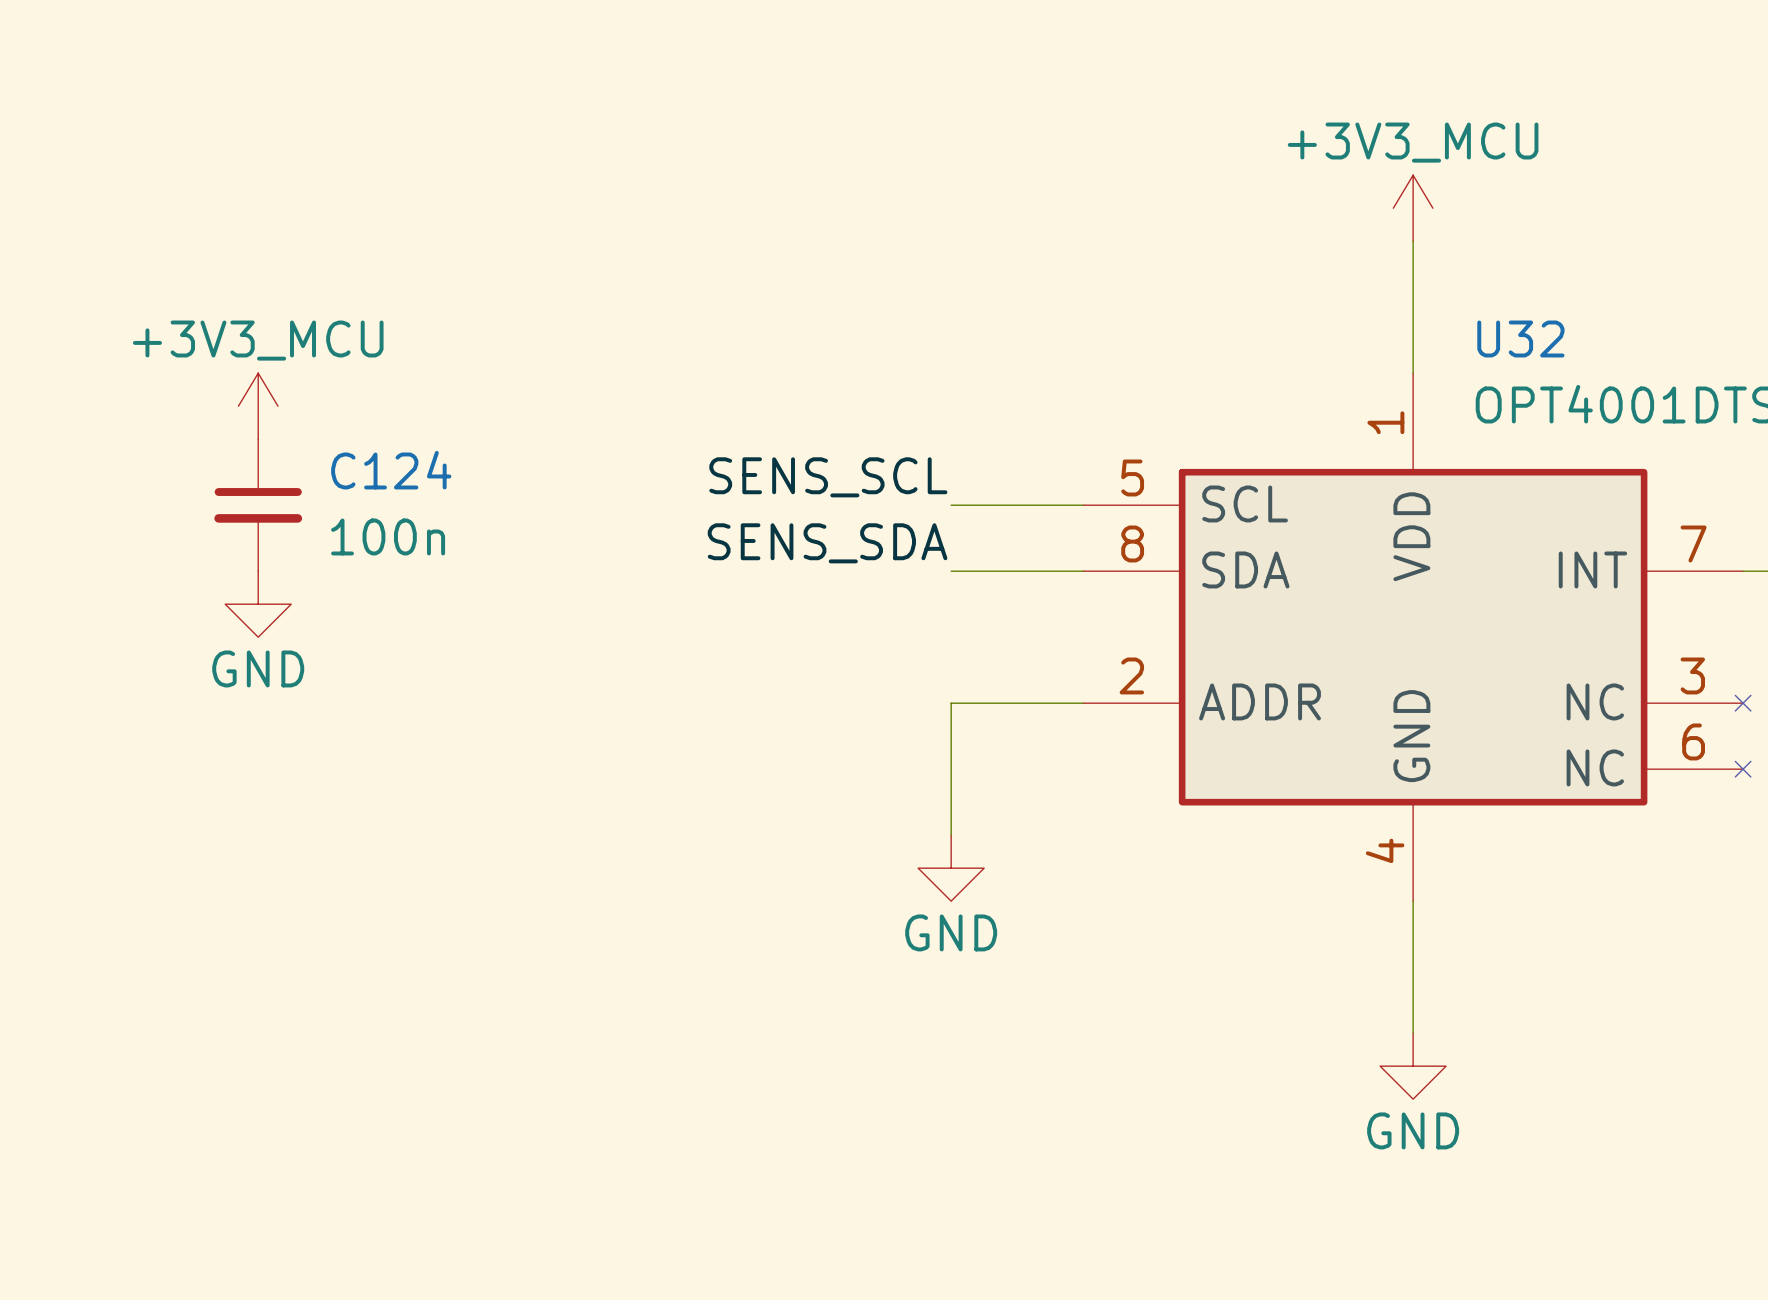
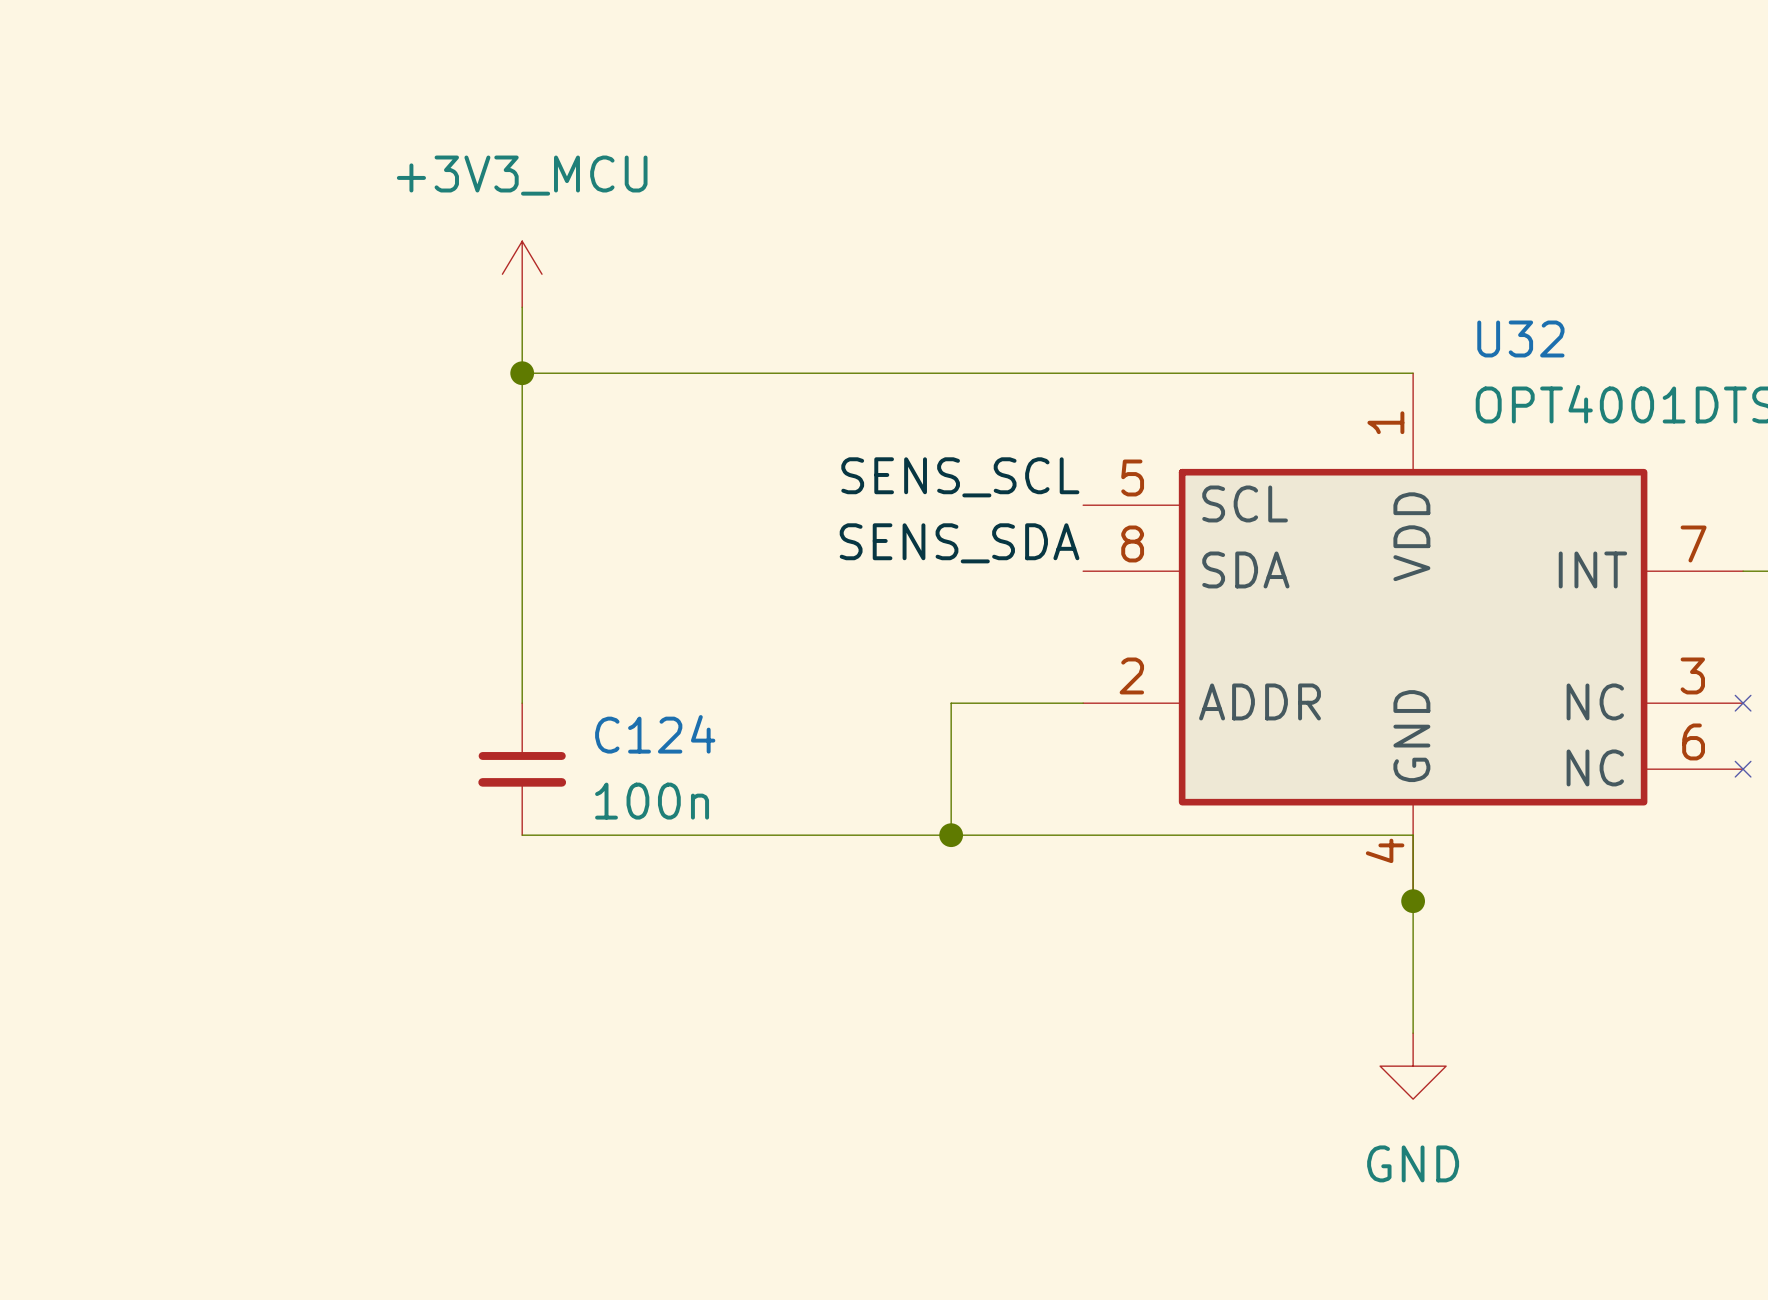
power symbol: +3V3_MCU (1413, 208) -> none
wire: (1413, 241) (1413, 373) -> (522, 373) (1413, 373)
wire: none -> (522, 307) (522, 703)
power symbol text position: +3V3_MCU (258, 340) -> +3V3_MCU (522, 175)
junction: none -> (522, 373)
power symbol position: +3V3_MCU (258, 406) -> +3V3_MCU (522, 274)
label position: SENS_SCL (828, 477) -> SENS_SCL (960, 477)
C124 position: (258, 505) -> (522, 769)
wire: (951, 505) (1083, 505) -> none
label position: SENS_SDA (827, 543) -> SENS_SDA (959, 543)
wire: (951, 571) (1083, 571) -> none
power symbol: GND (258, 604) -> none
wire: none -> (522, 835) (1413, 835) (1413, 901)
junction: none -> (951, 835)
power symbol: GND (951, 868) -> none
junction: none -> (1413, 901)
power symbol text position: GND (1413, 1130) -> GND (1413, 1163)

